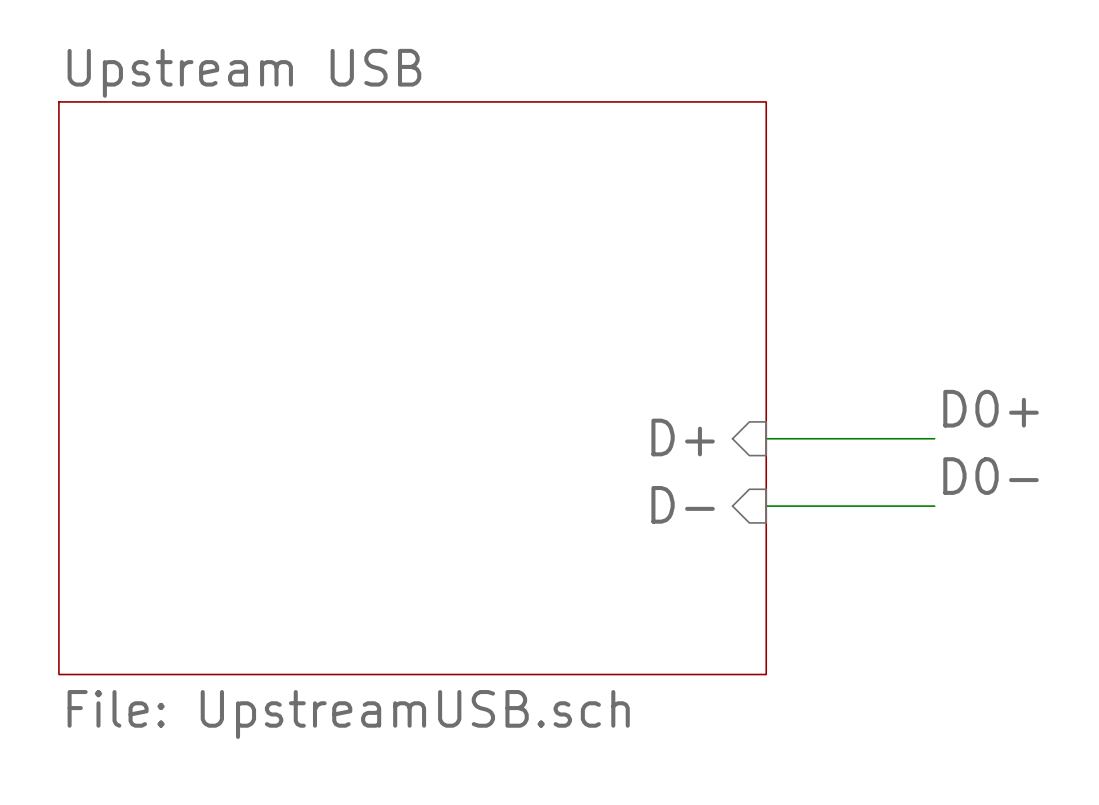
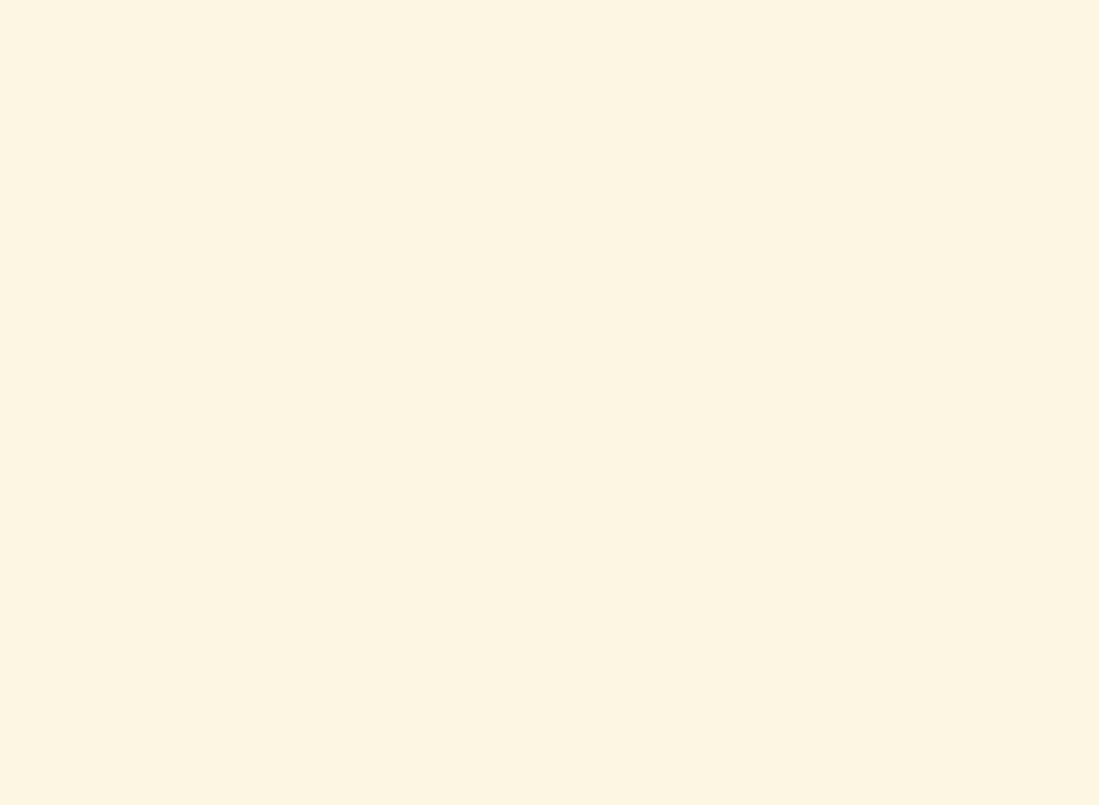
sheet Upstream USB: File: UpstreamUSB.sch (412, 388) -> none
label: D0+ (991, 408) -> none
sheet pin: D+ (683, 437) -> none
wire: (766, 438) (934, 438) -> none
label: D0- (991, 476) -> none
sheet pin: D- (683, 504) -> none
wire: (766, 506) (934, 506) -> none

